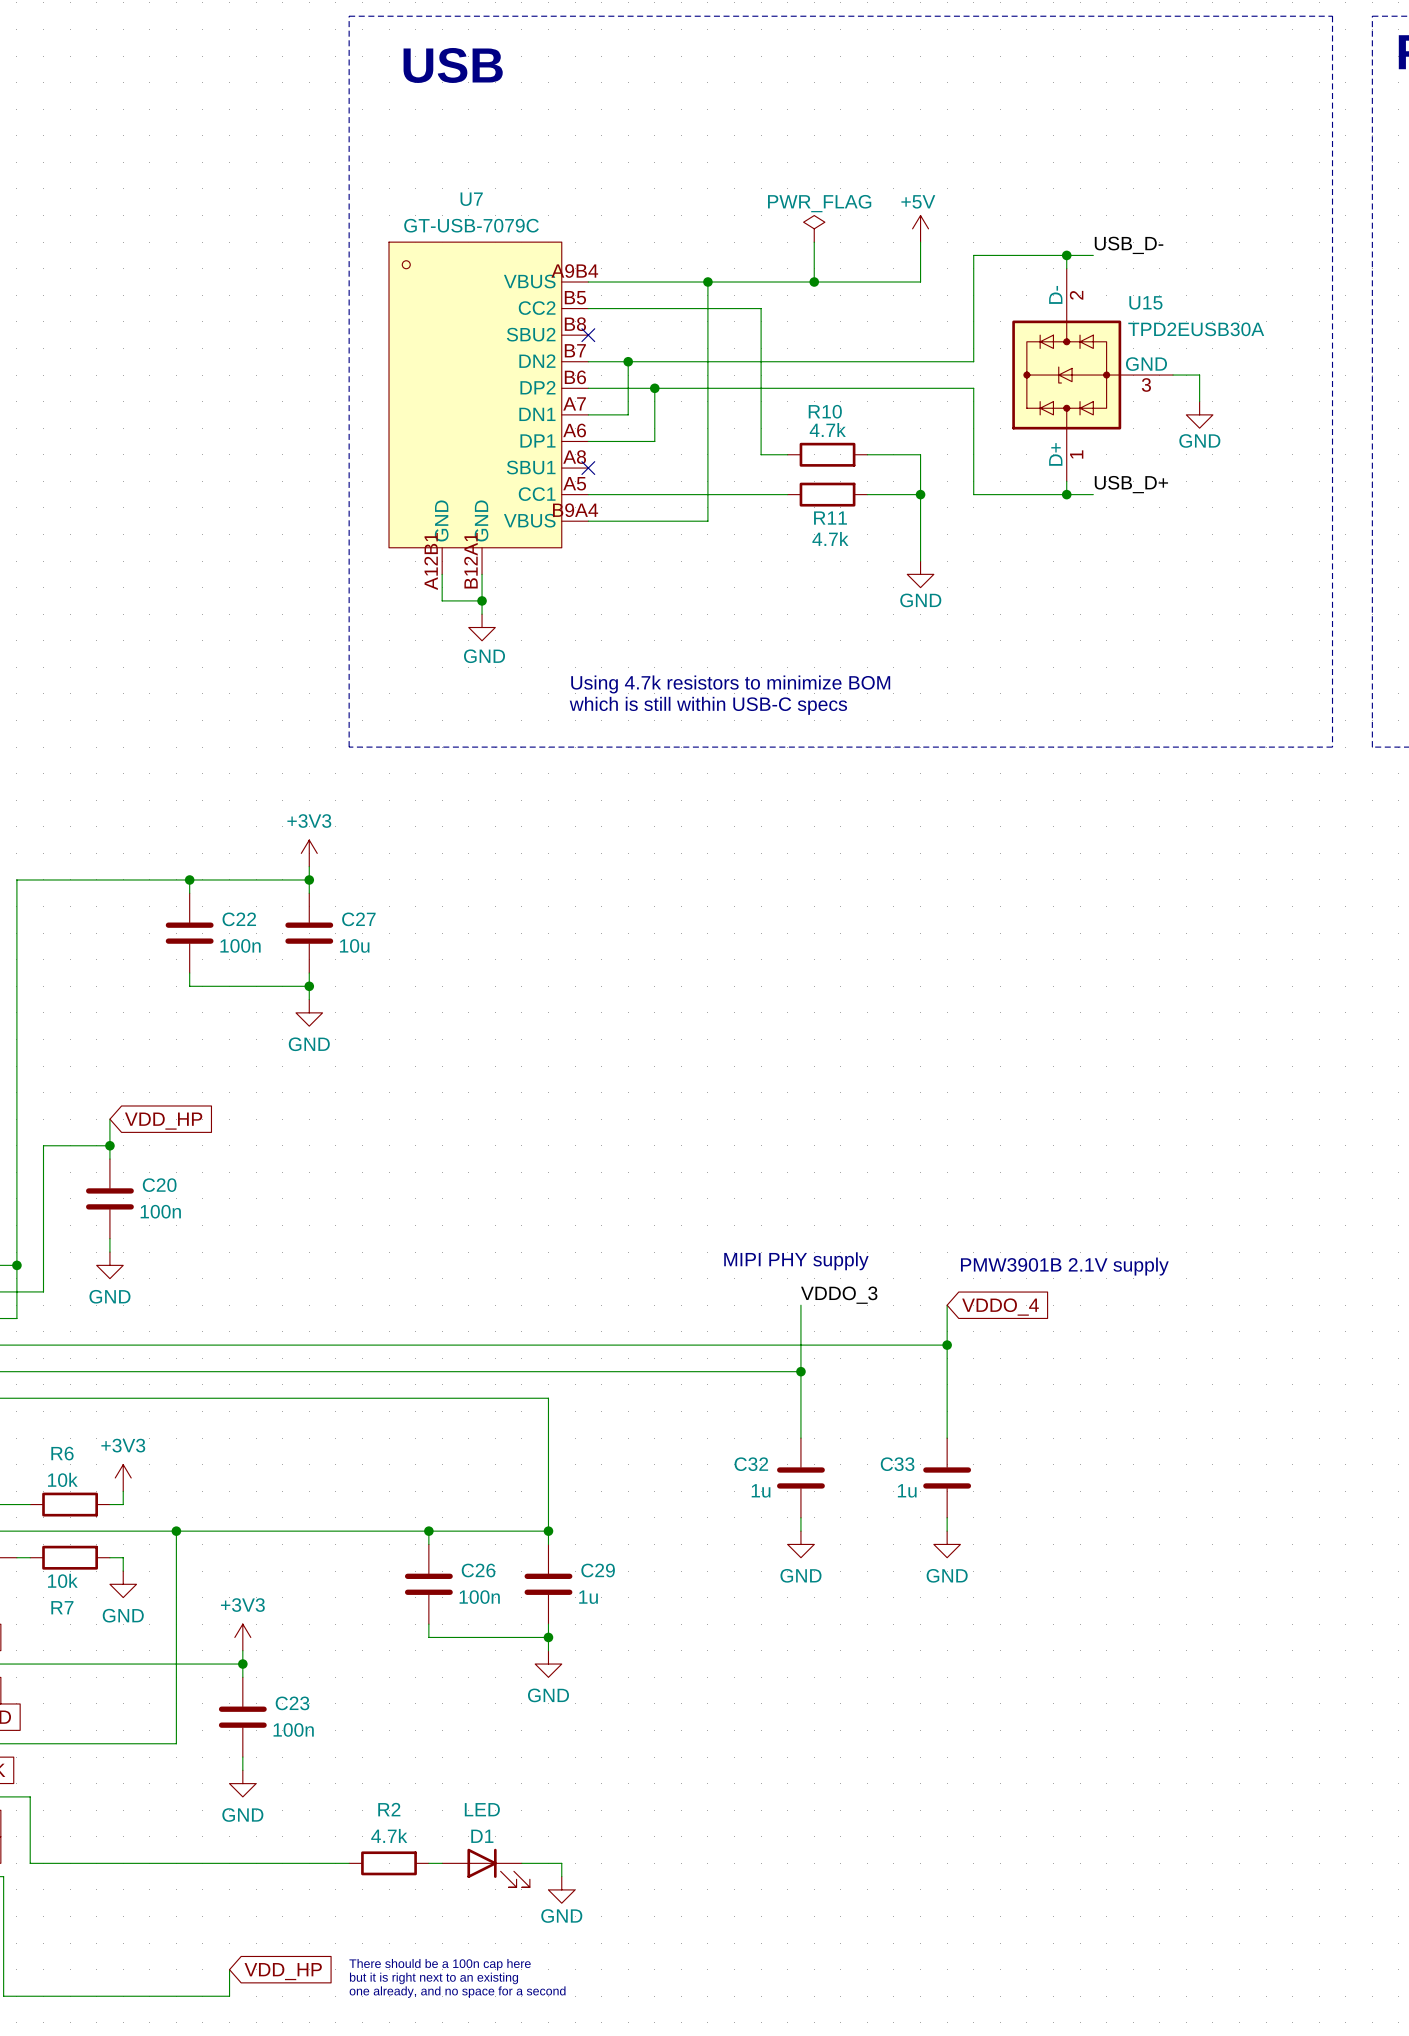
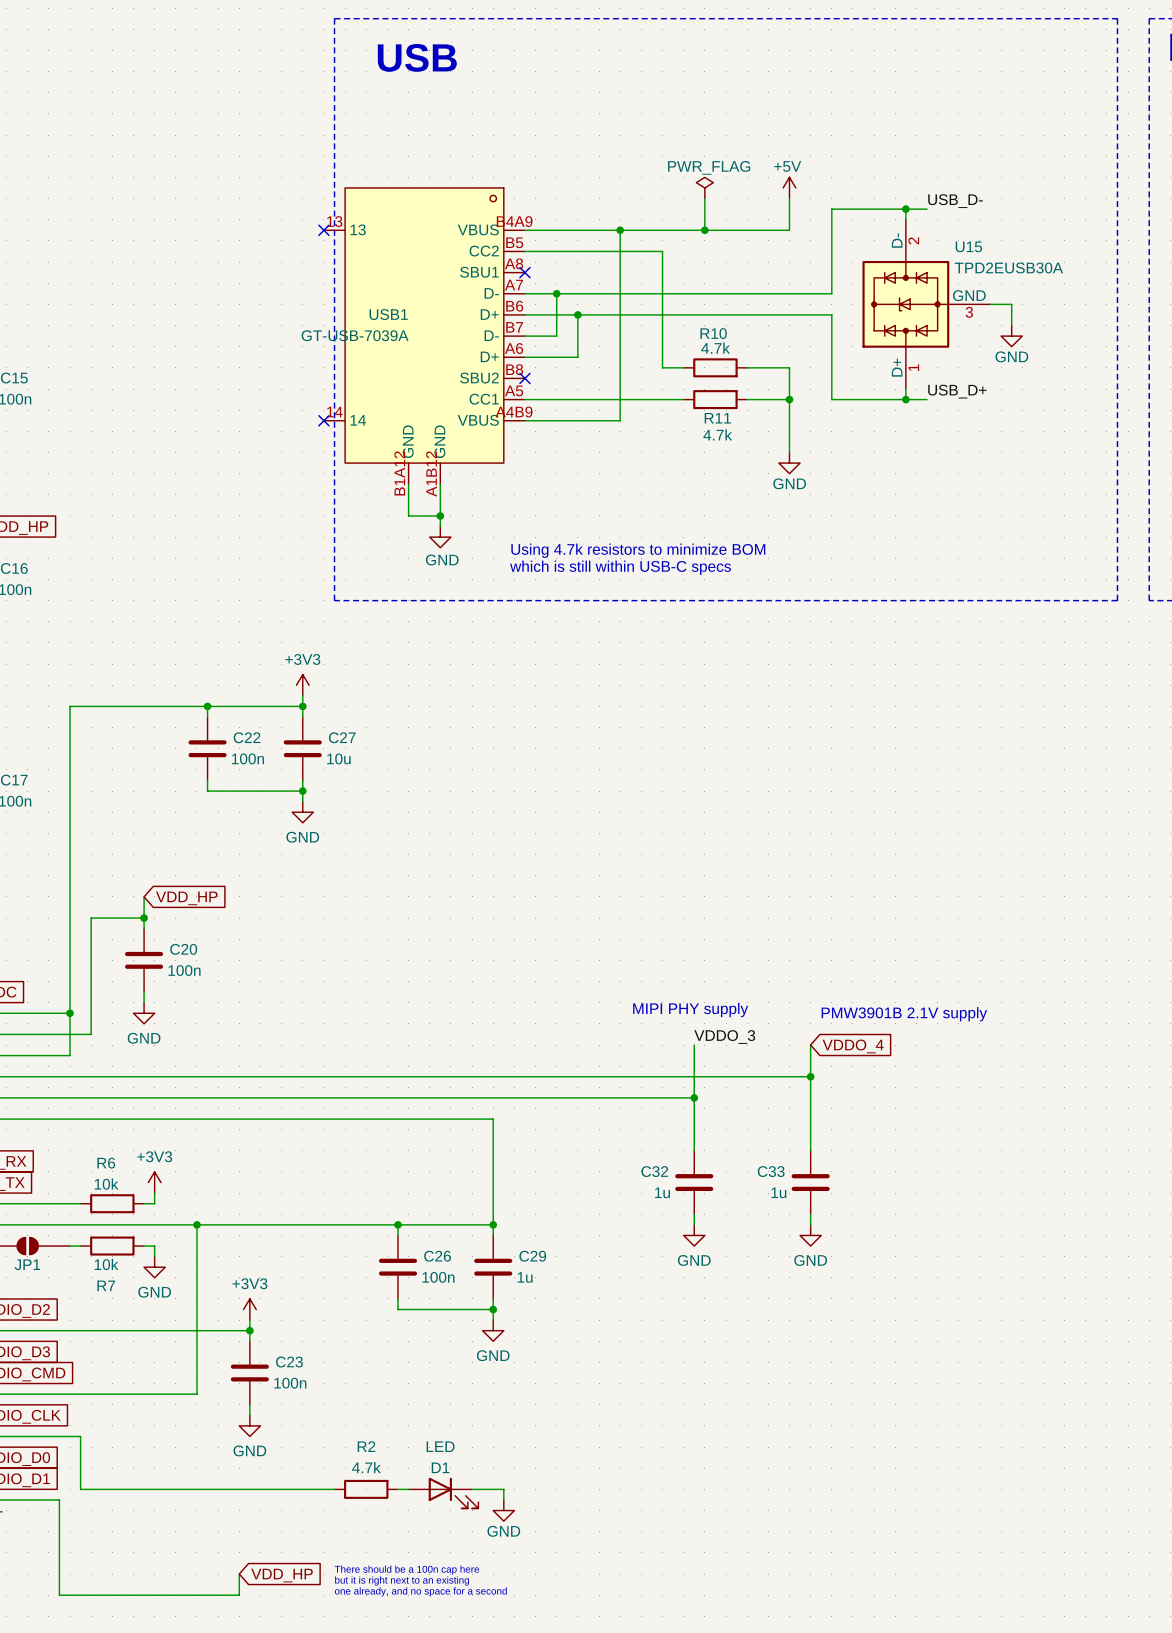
no-connect mark: none -> (323, 230)
U7: GT-USB-7079C (488, 408) -> none
USB1: none -> GT-USB-7039A (424, 336)
no-connect mark: none -> (323, 420)
wire: (442, 574) (442, 600) (482, 600) (482, 574) -> none
wire: none -> (408, 484) (408, 515) (440, 515)
junction position: (482, 600) -> (440, 515)
wire: none -> (440, 494) (440, 526)
power symbol position: GND (482, 627) -> GND (440, 537)

